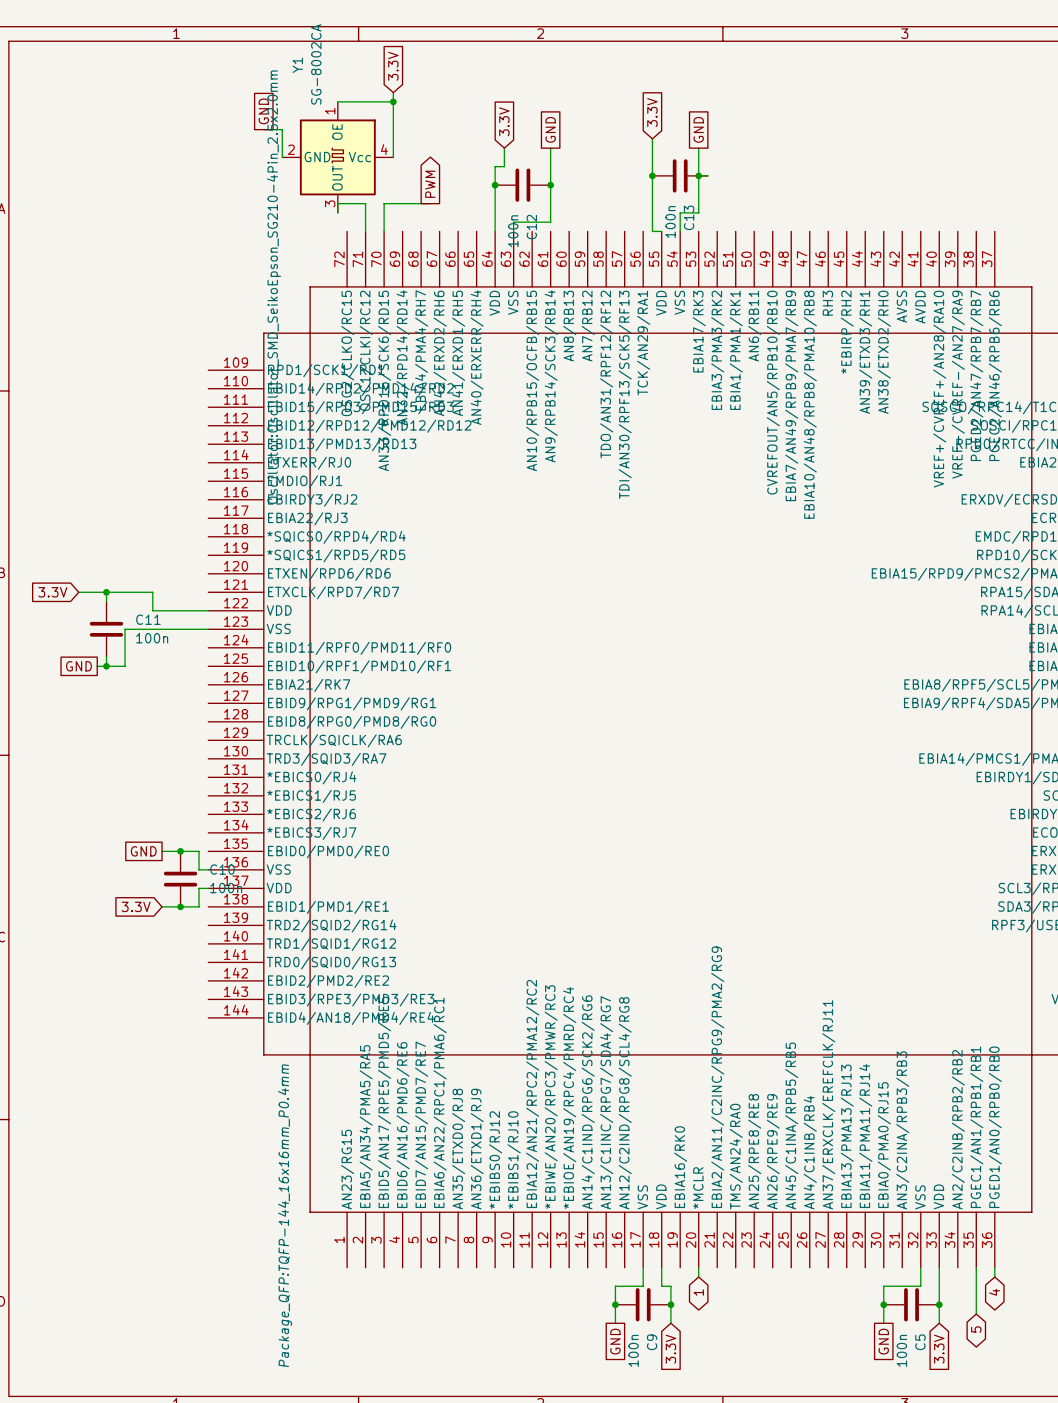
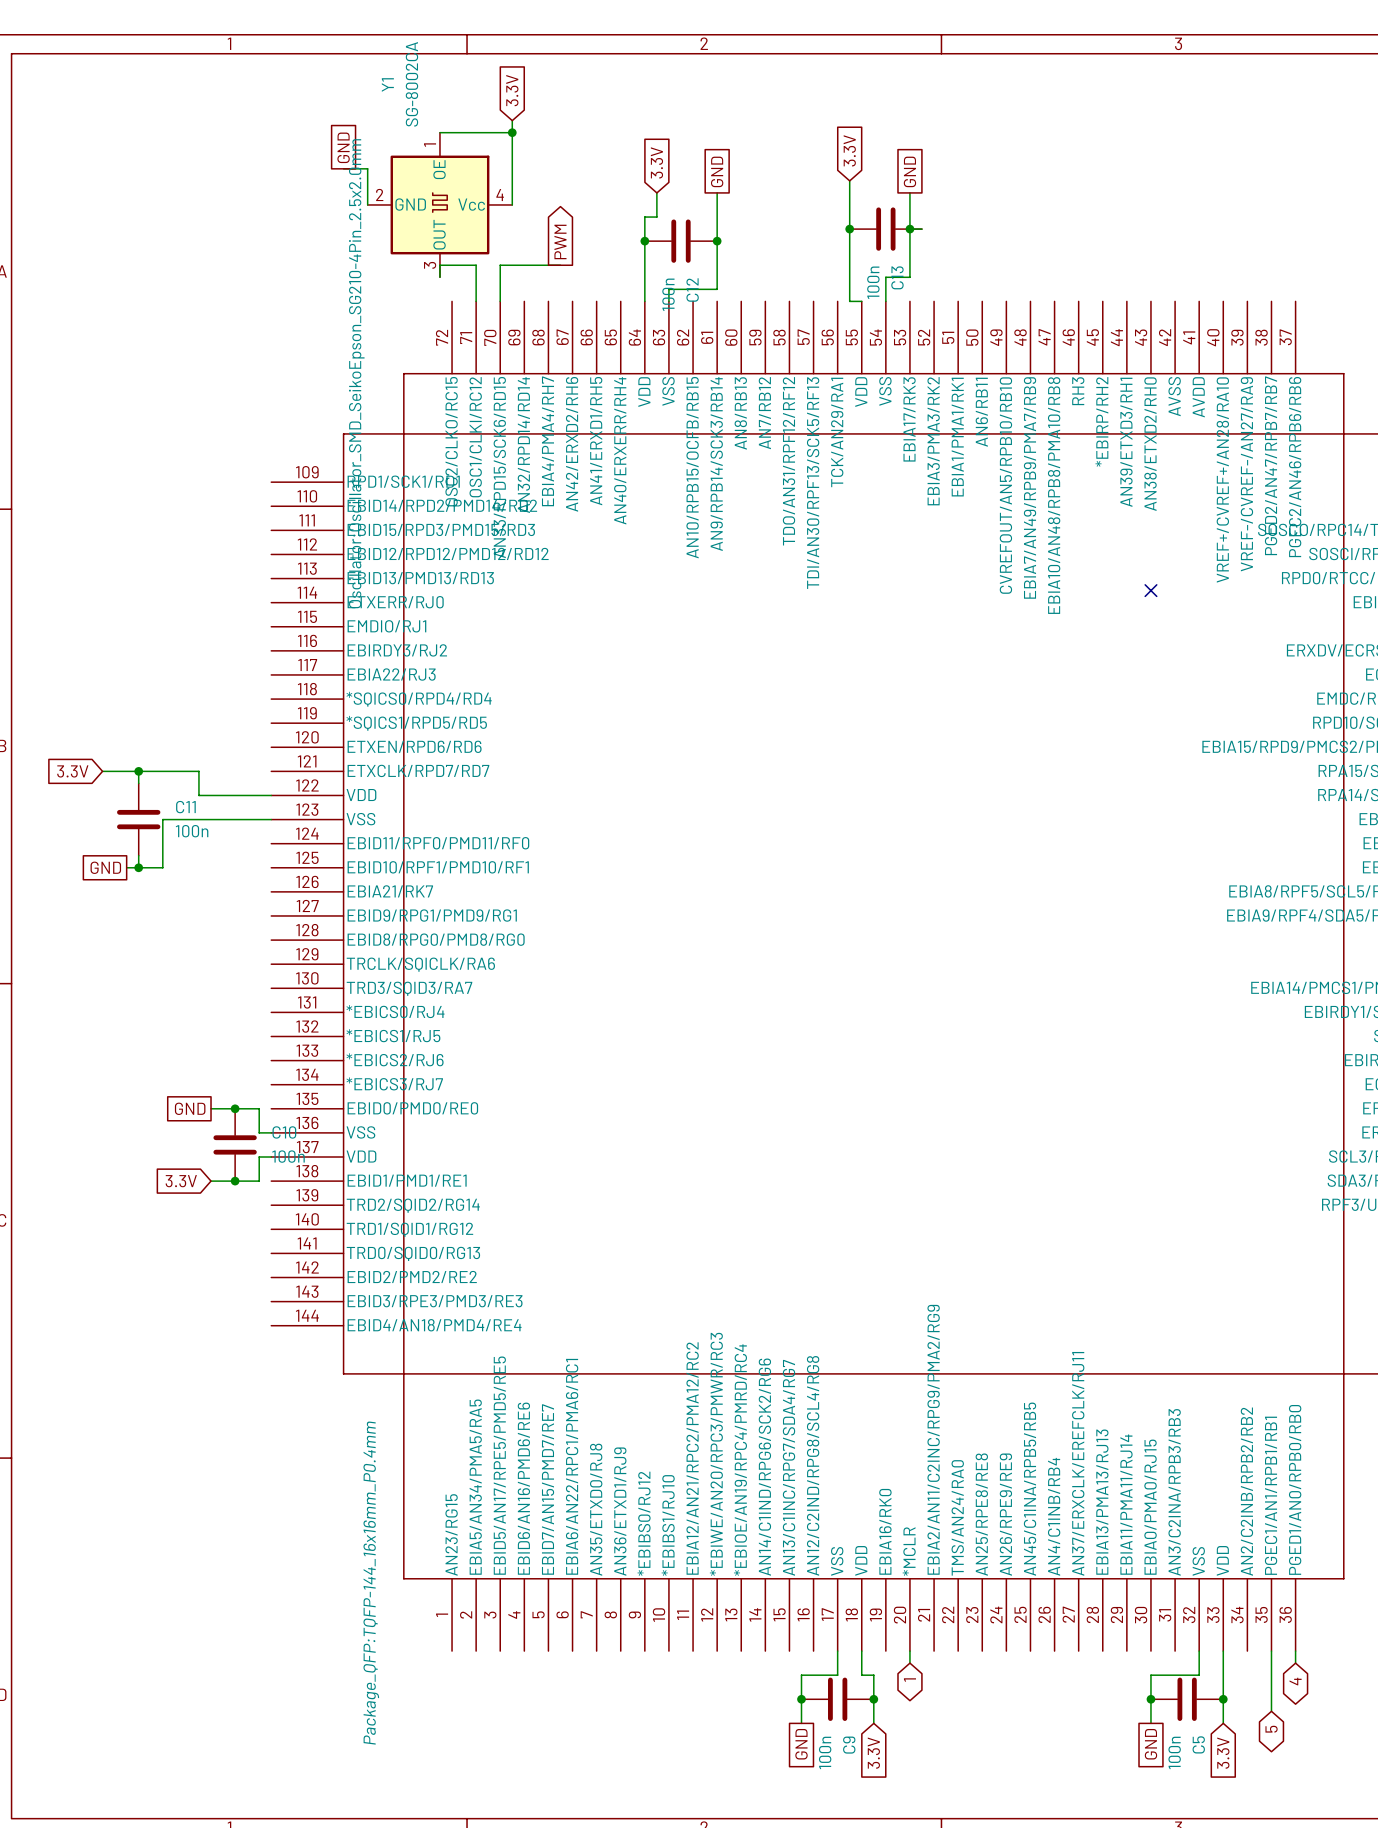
no-connect mark: none -> (1150, 590)

